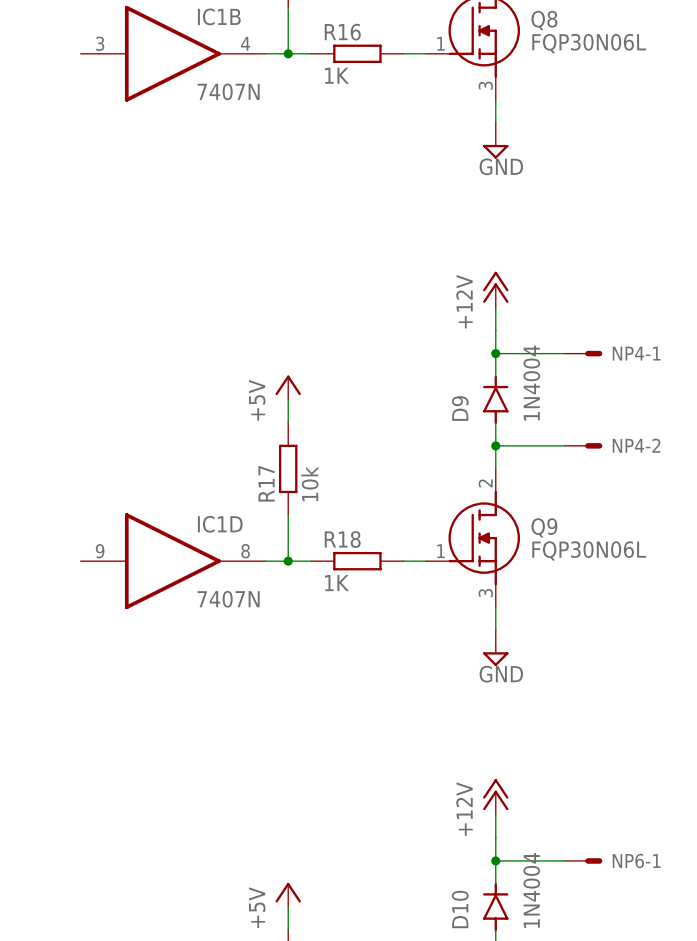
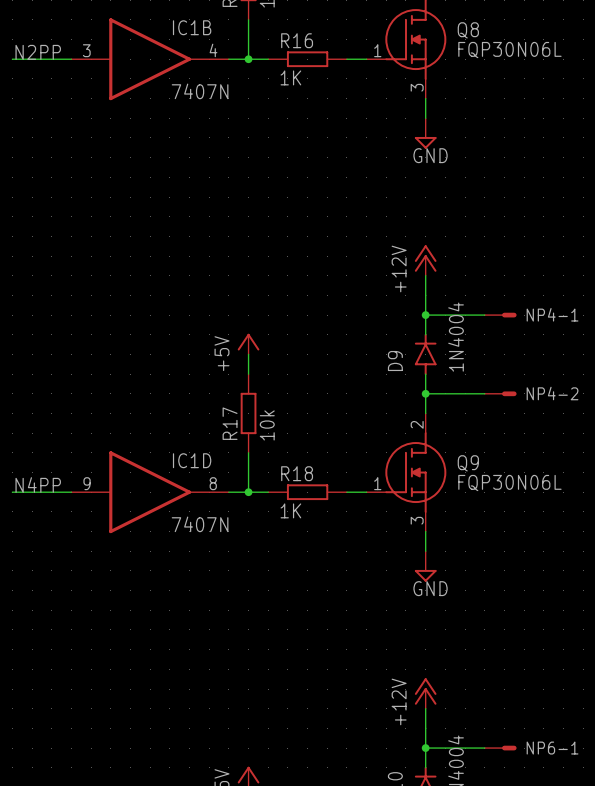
label: none -> N2PP (38, 52)
wire: none -> (12, 59) (71, 59)
label: none -> N4PP (38, 484)
wire: none -> (12, 492) (71, 492)

